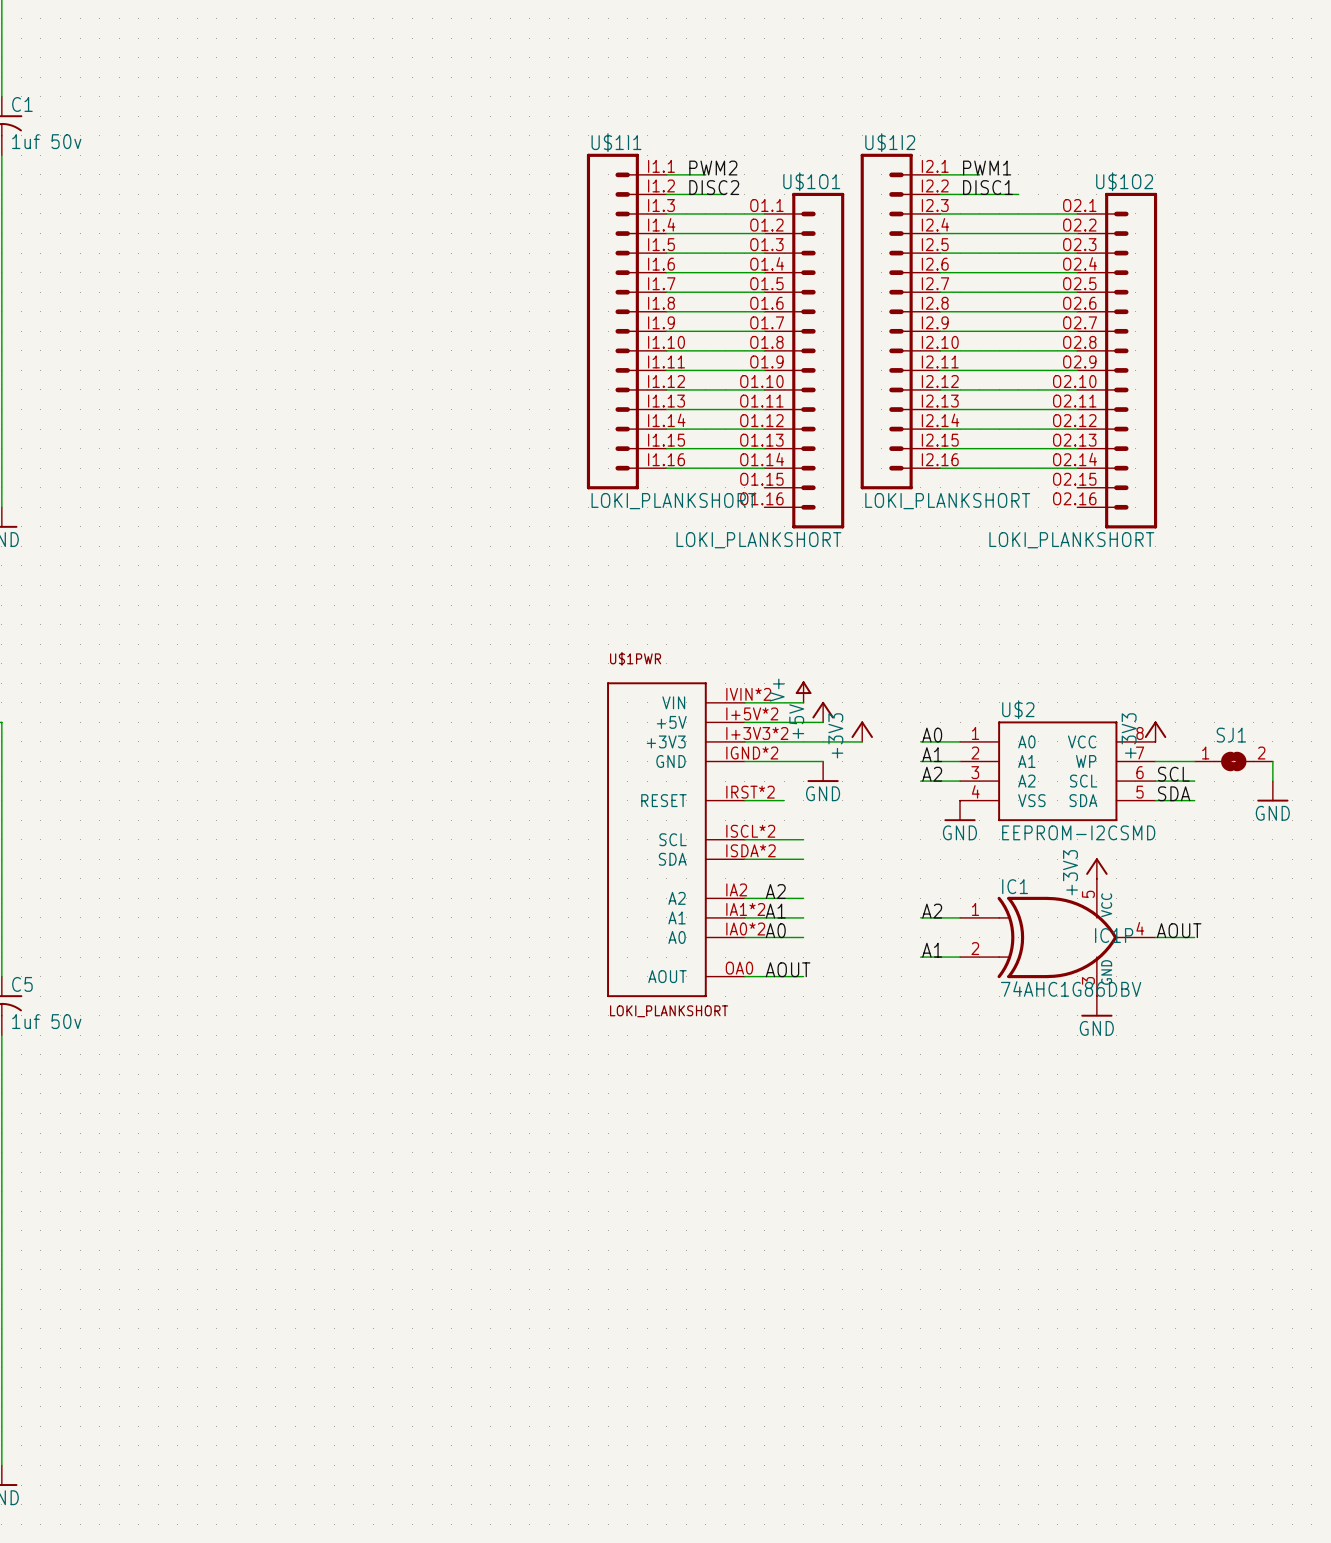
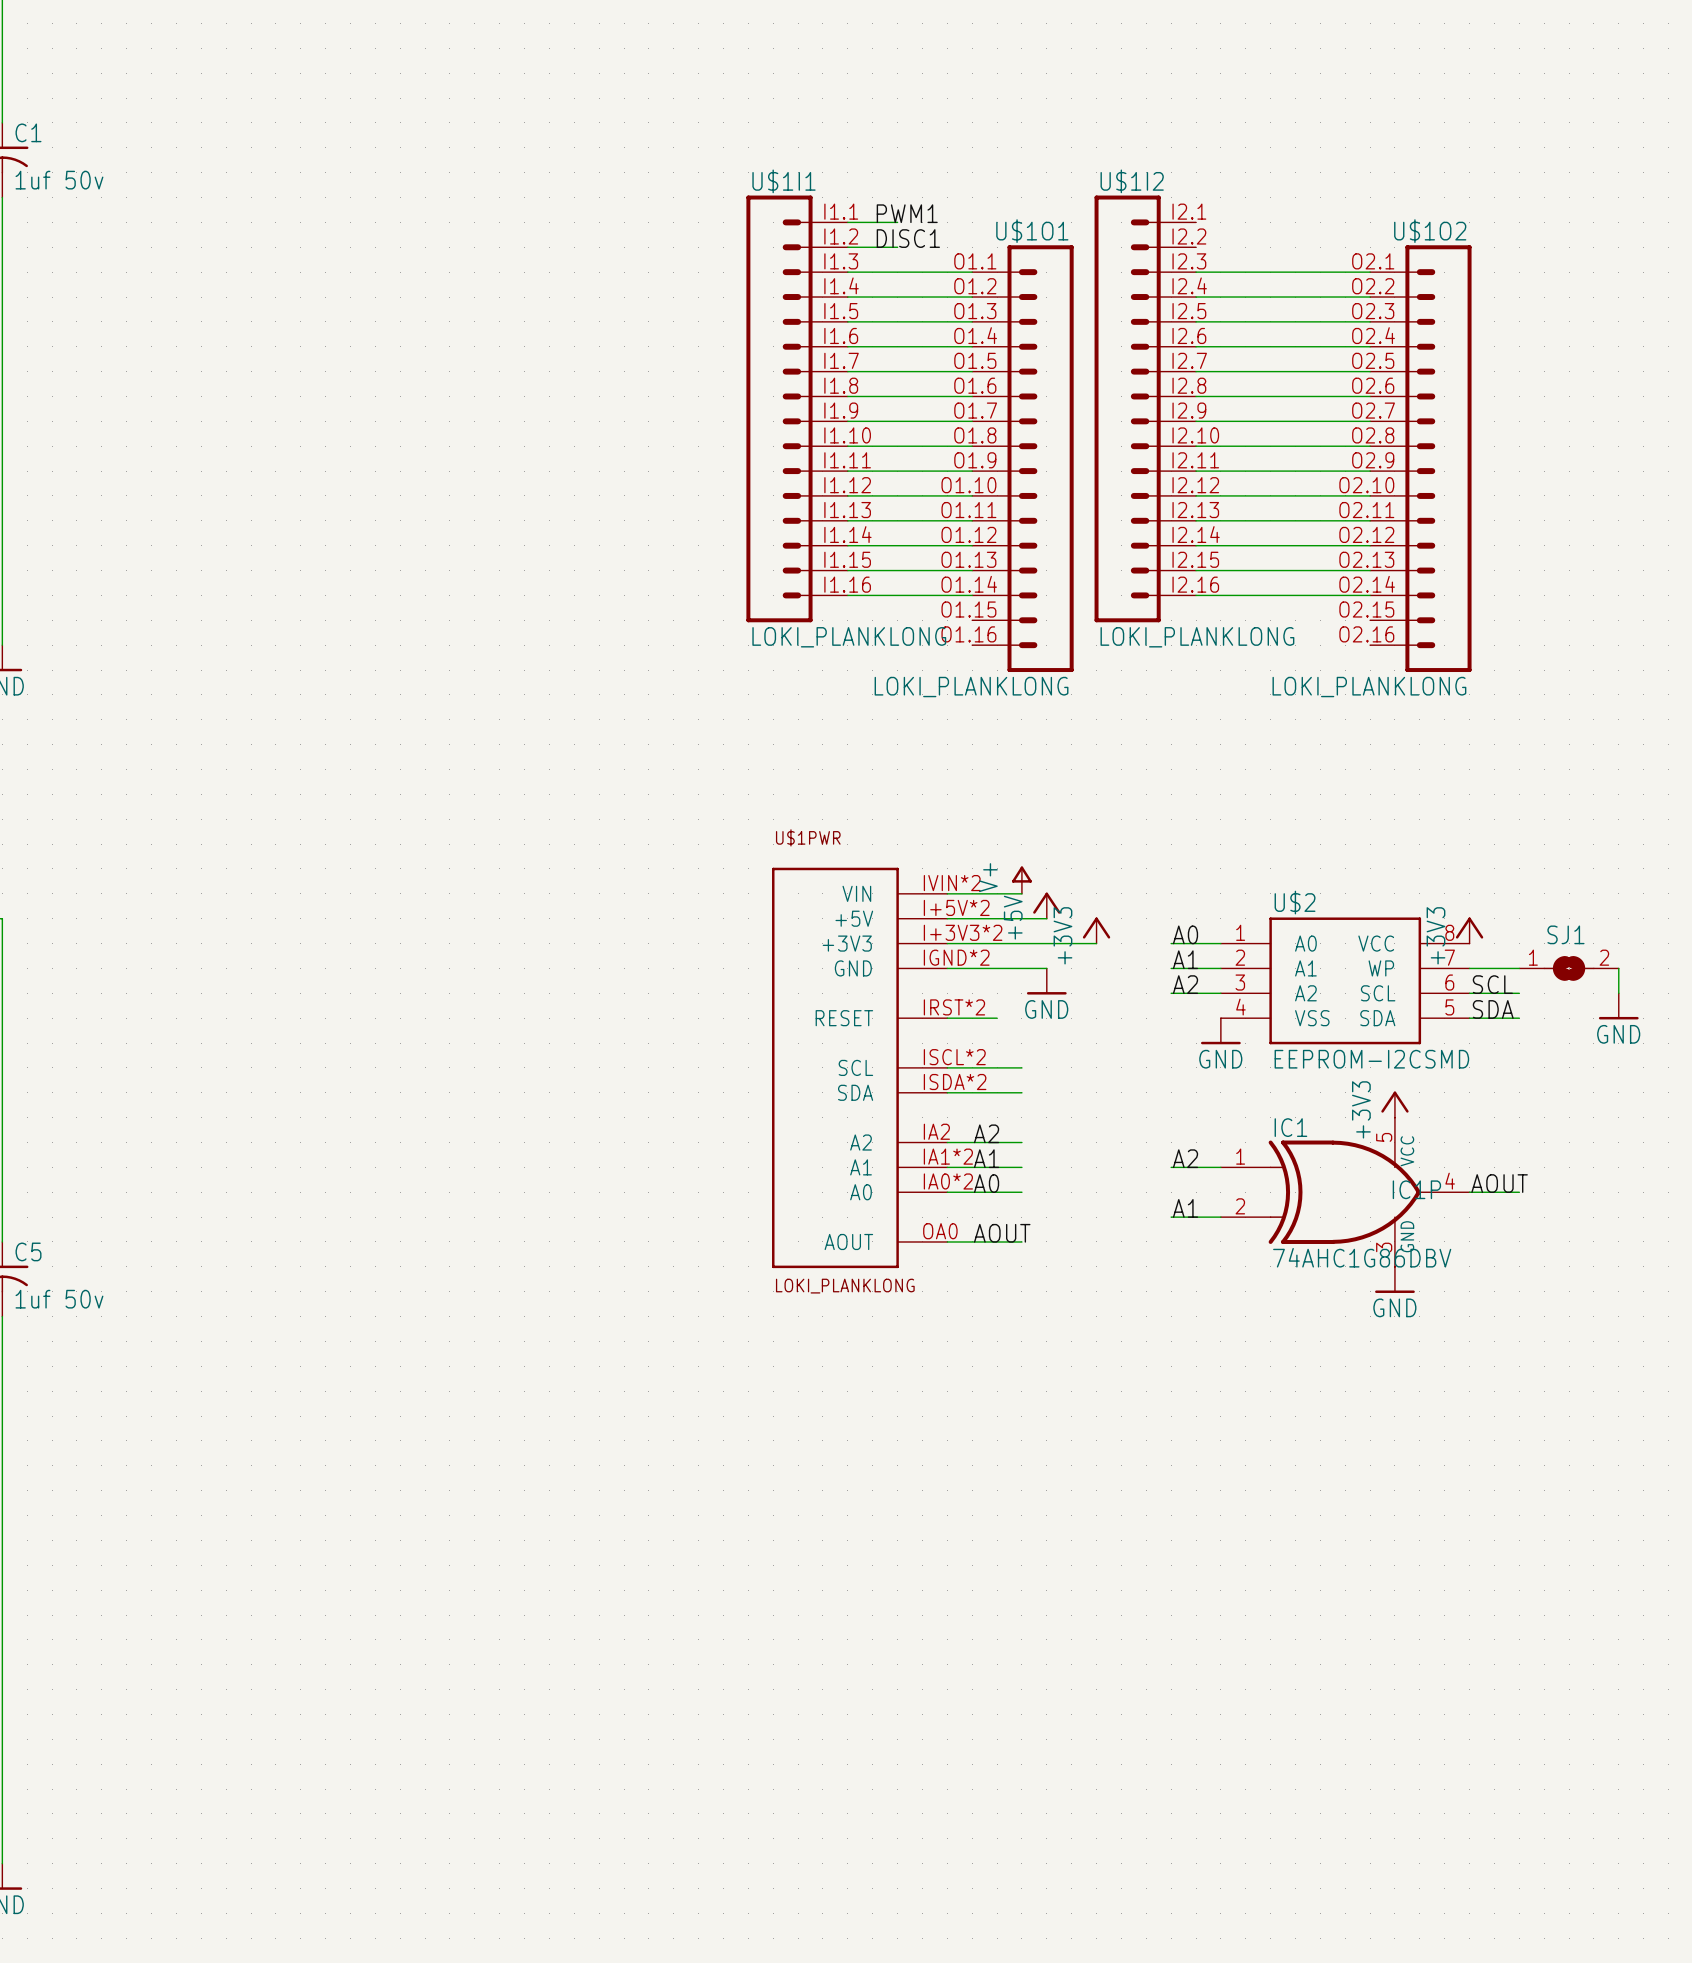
label: PWM2 (713, 168) -> PWM1 (907, 213)
label: PWM1 (987, 168) -> none
wire: (940, 174) (979, 174) -> none
label: DISC2 (714, 187) -> DISC1 (908, 238)
label: DISC1 (988, 187) -> none
wire: (940, 194) (1018, 194) -> none
U$1I1 value: LOKI_PLANKSHORT (673, 501) -> LOKI_PLANKLONG (849, 637)
U$1I2 value: LOKI_PLANKSHORT (947, 501) -> LOKI_PLANKLONG (1197, 637)
U$1O1 value: LOKI_PLANKSHORT (758, 540) -> LOKI_PLANKLONG (971, 687)
U$1O2 value: LOKI_PLANKSHORT (1071, 540) -> LOKI_PLANKLONG (1369, 687)
U$1PWR value: LOKI_PLANKSHORT (669, 1011) -> LOKI_PLANKLONG (845, 1286)

